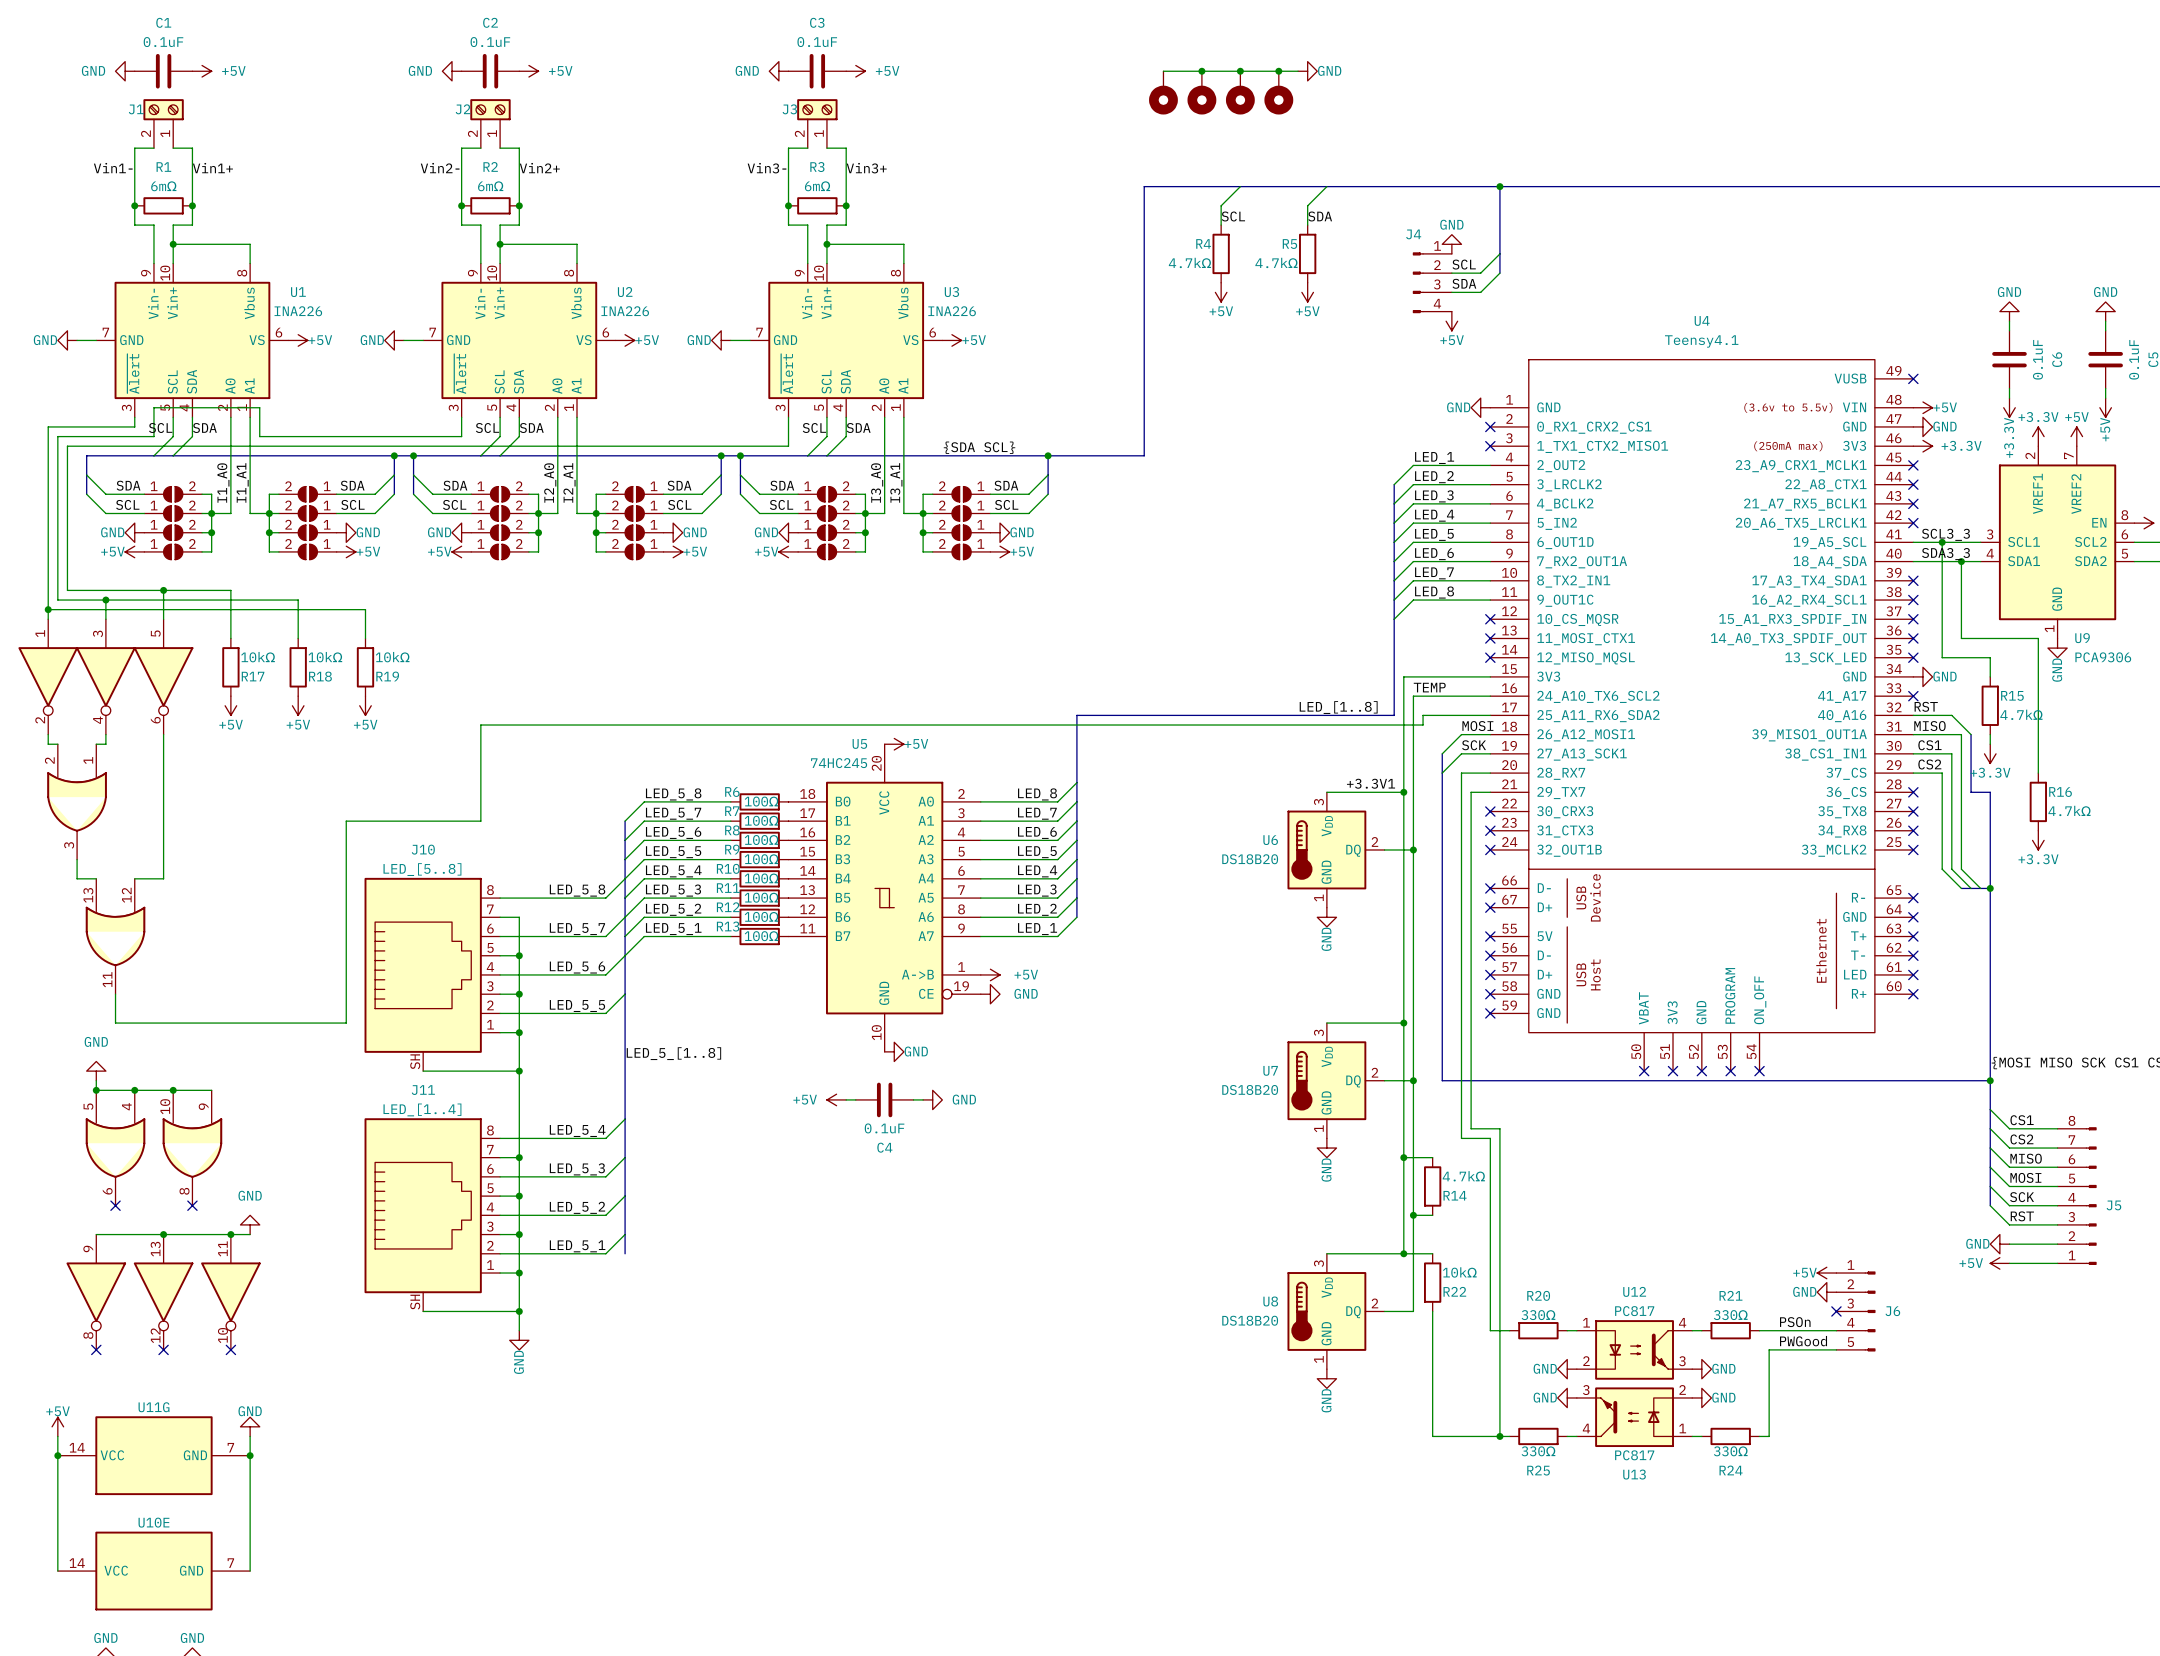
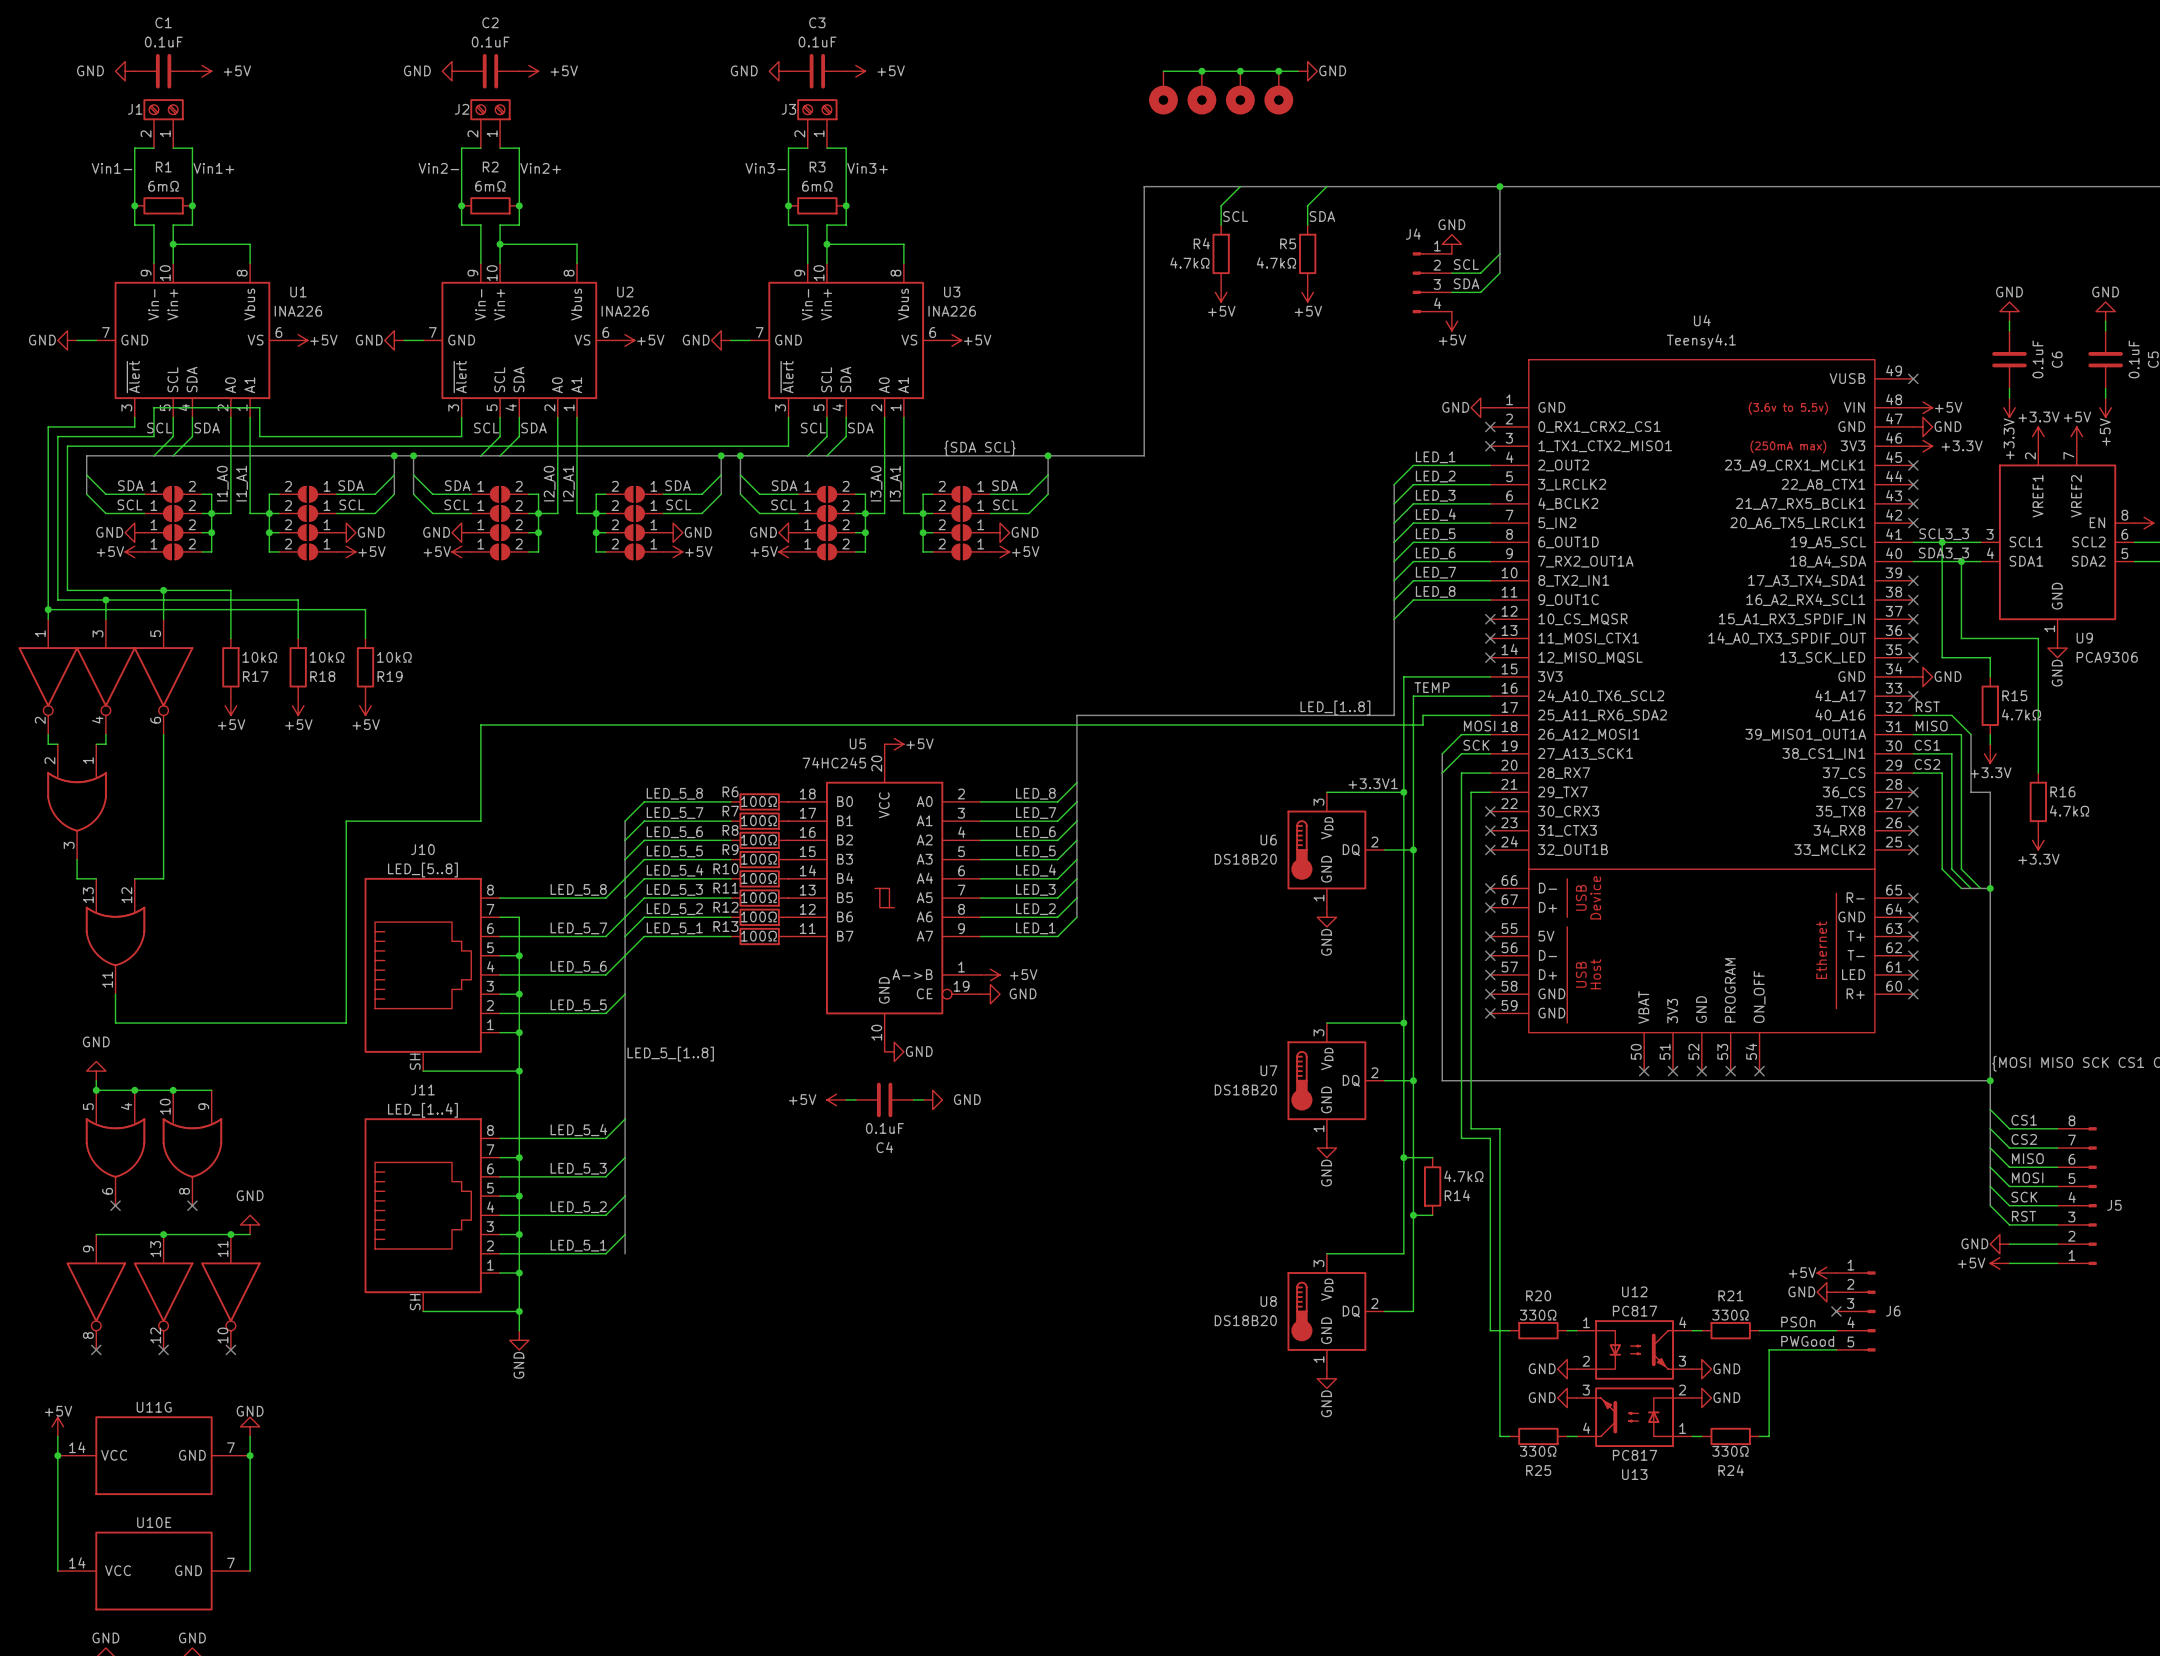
wire: (1403, 1253) (1432, 1253) -> none
junction: (1403, 1253) -> none
R22: 10kΩ (1432, 1282) -> none
wire: (1432, 1311) (1432, 1436) (1499, 1436) -> none
junction: (1499, 1436) -> none

